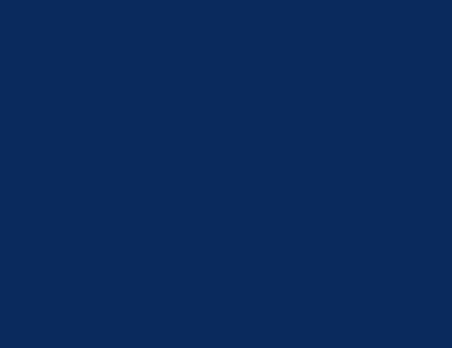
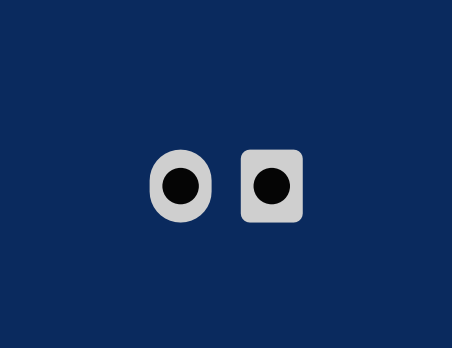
part: none -> (226, 186)

